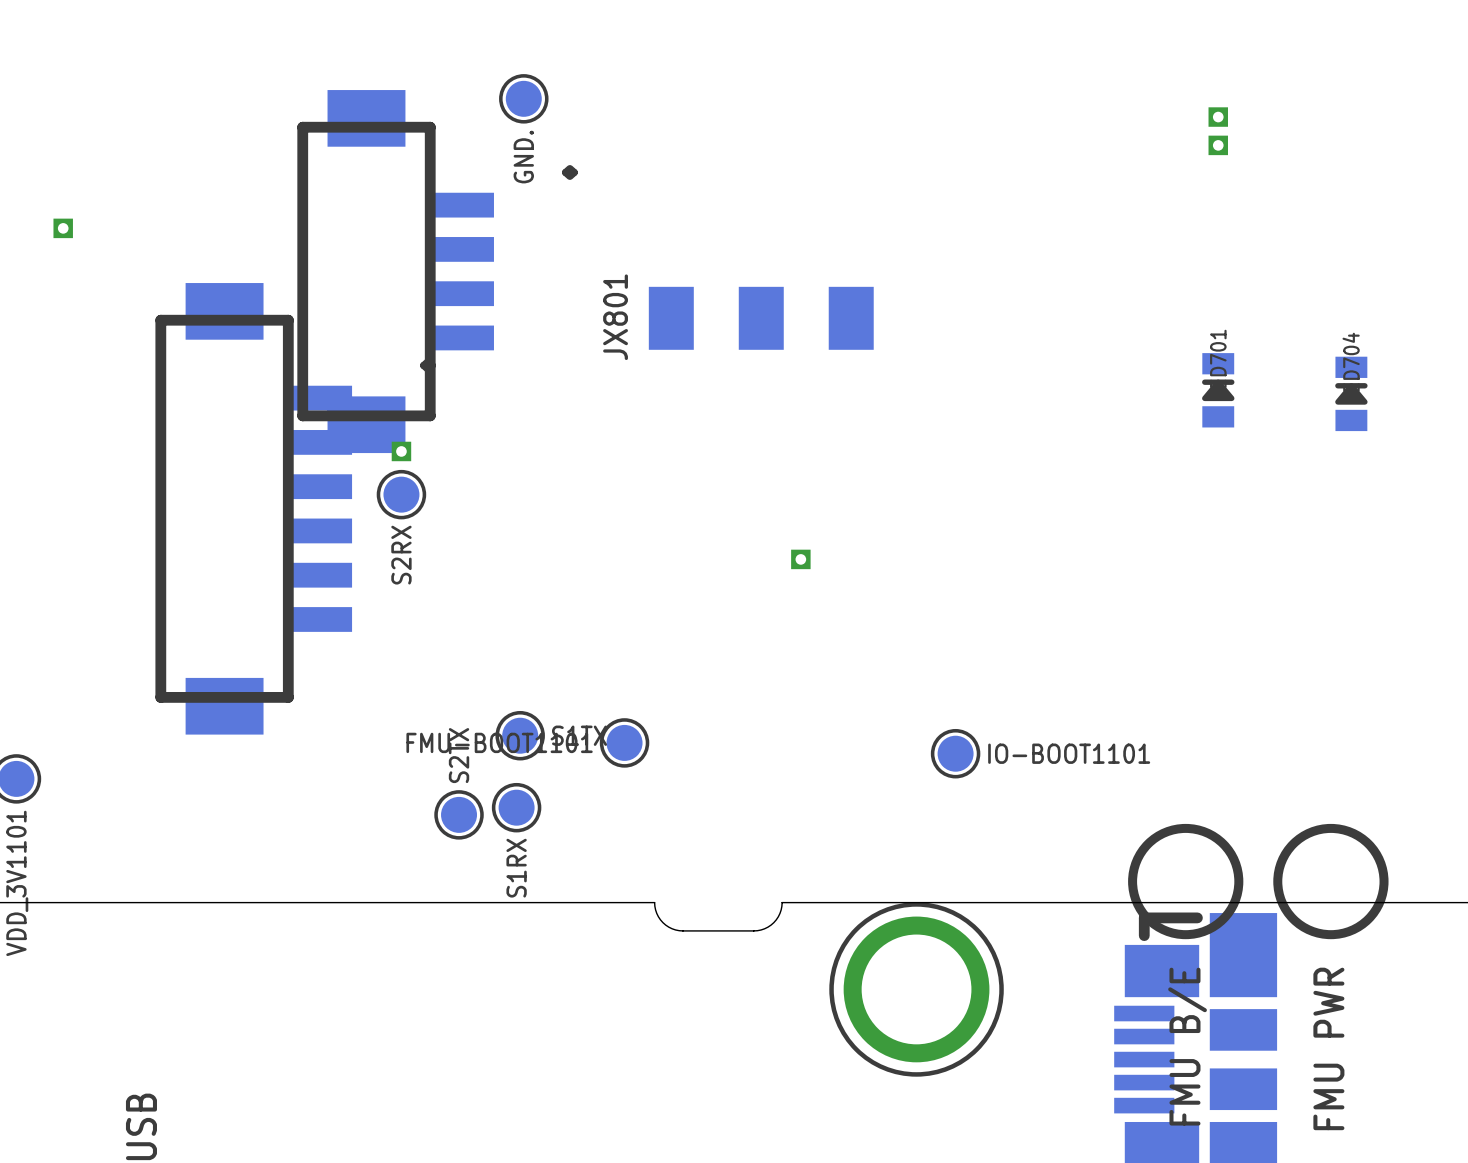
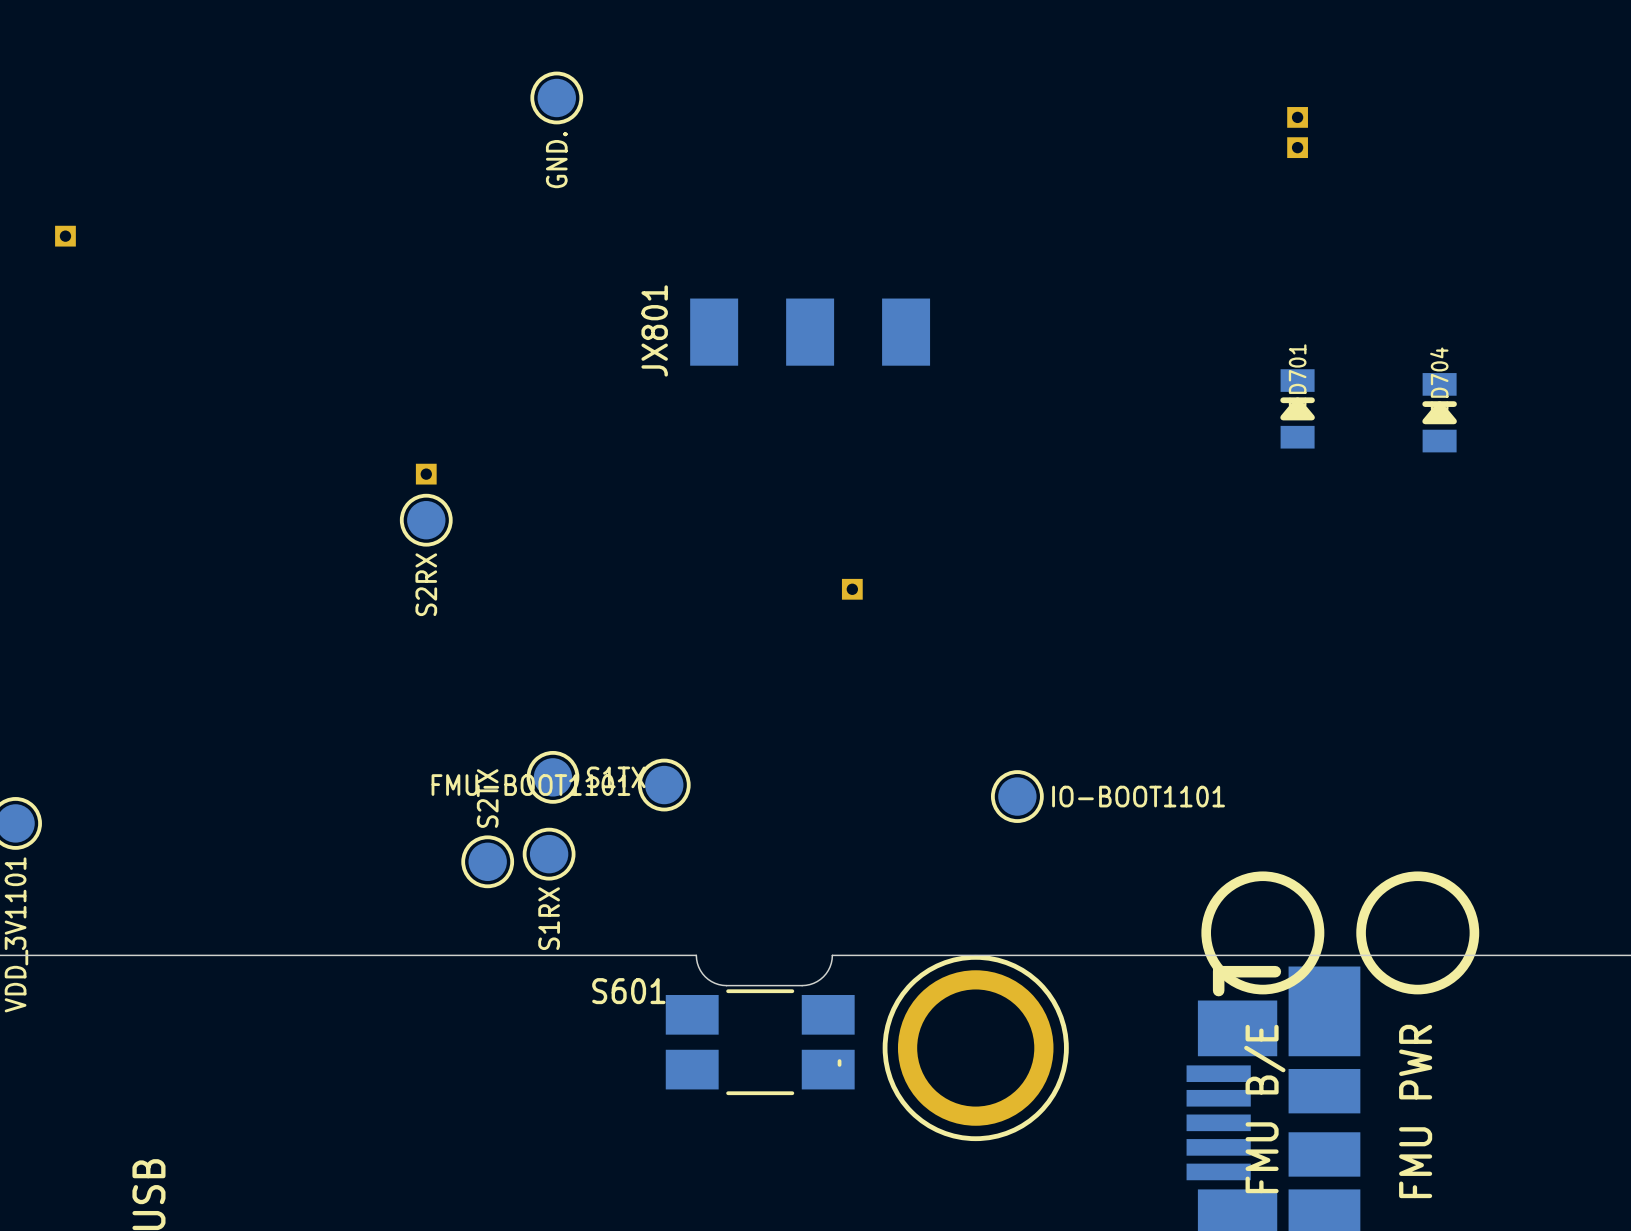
part: (395, 271) -> none
part: (253, 508) -> none
S601: none -> (760, 1042)

